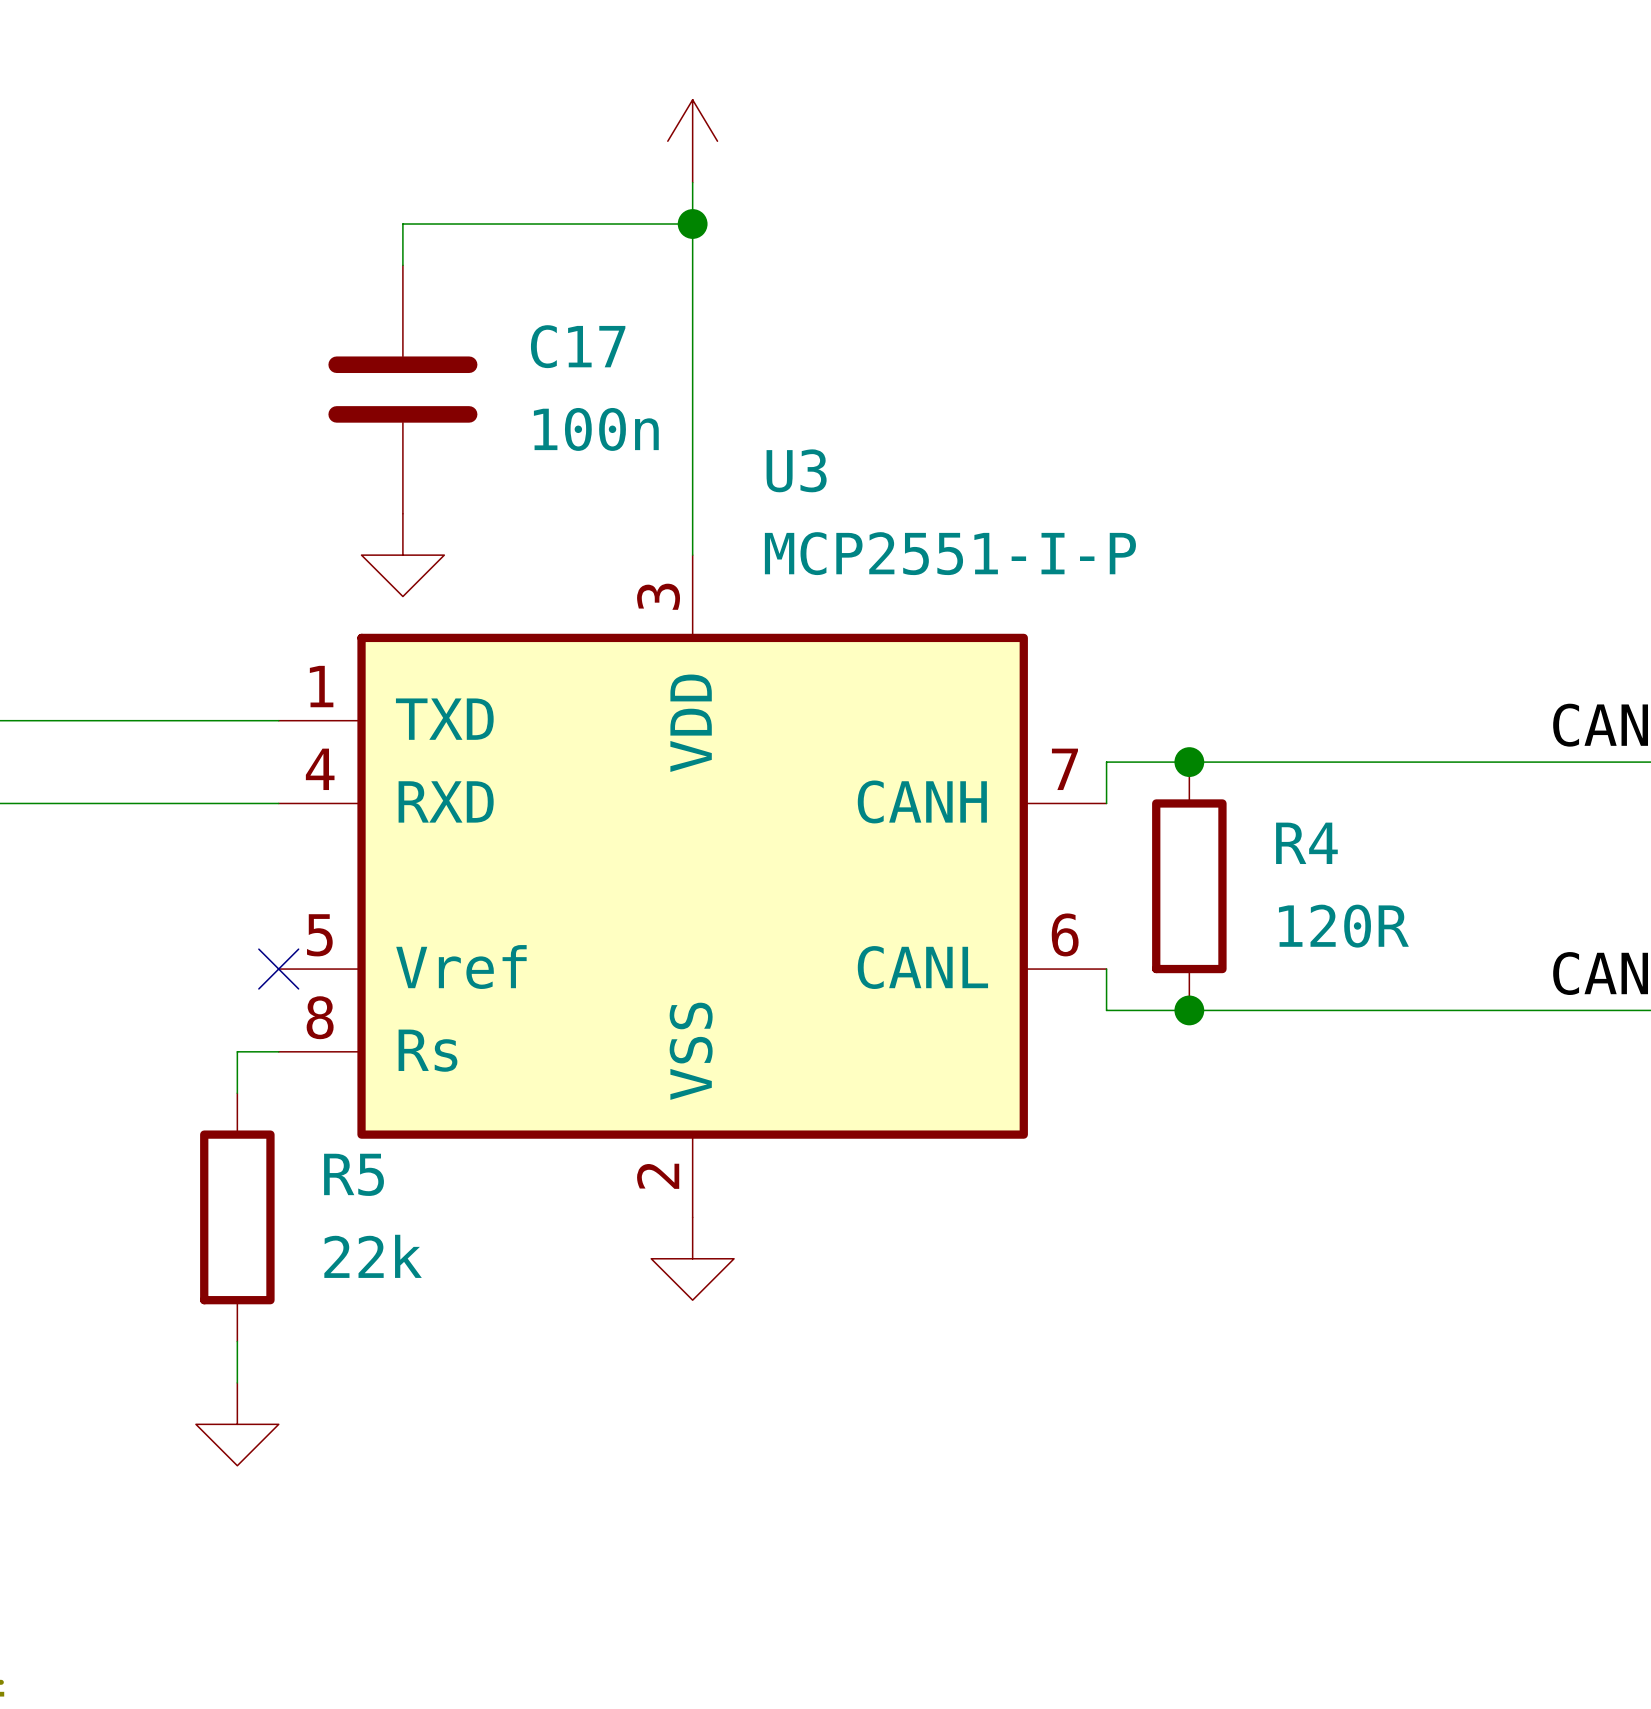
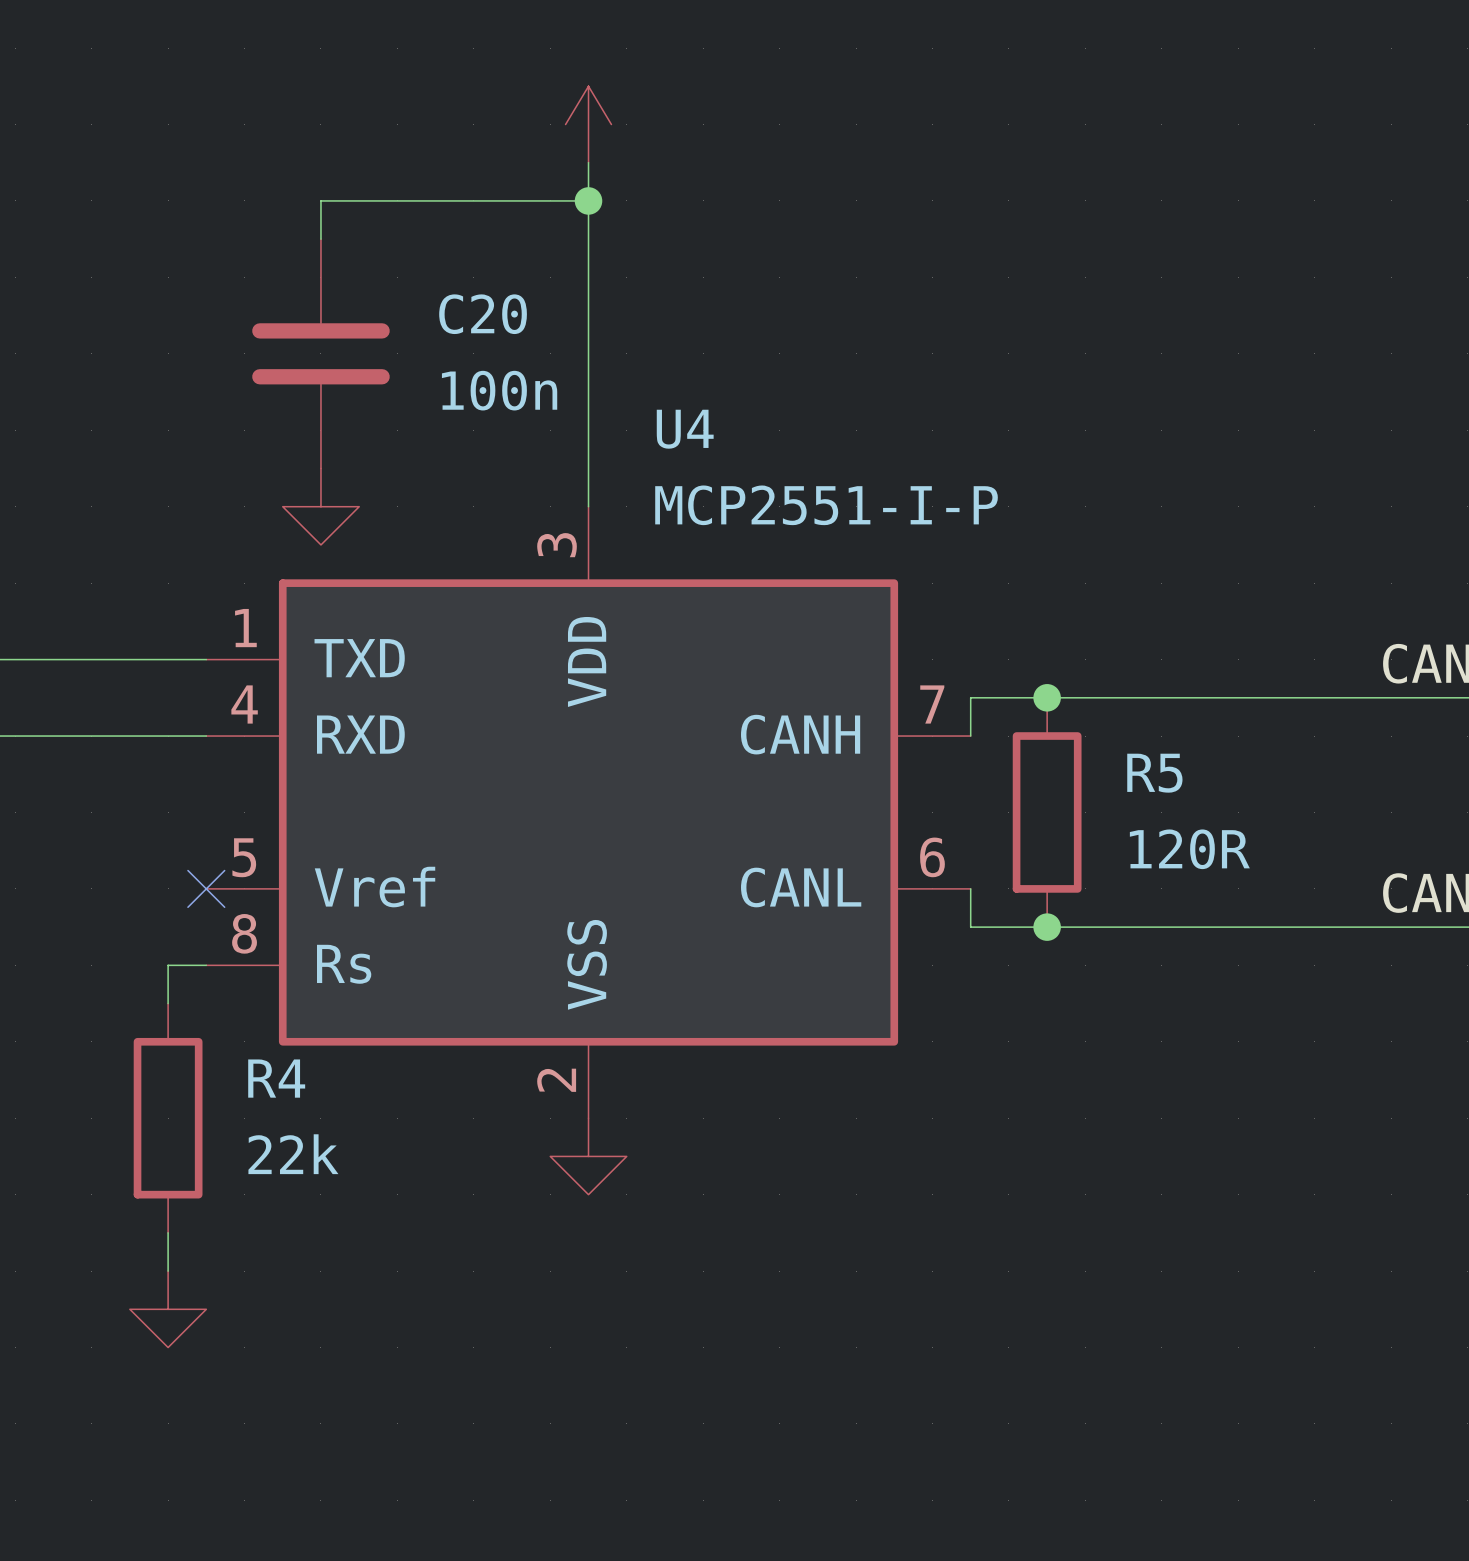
C17 name: C17 (578, 346) -> C20 (483, 314)
U3 name: U3 (796, 470) -> U4 (685, 429)
R4 name: R4 (1306, 843) -> R5 (1154, 773)
R5 name: R5 (354, 1174) -> R4 (276, 1078)

